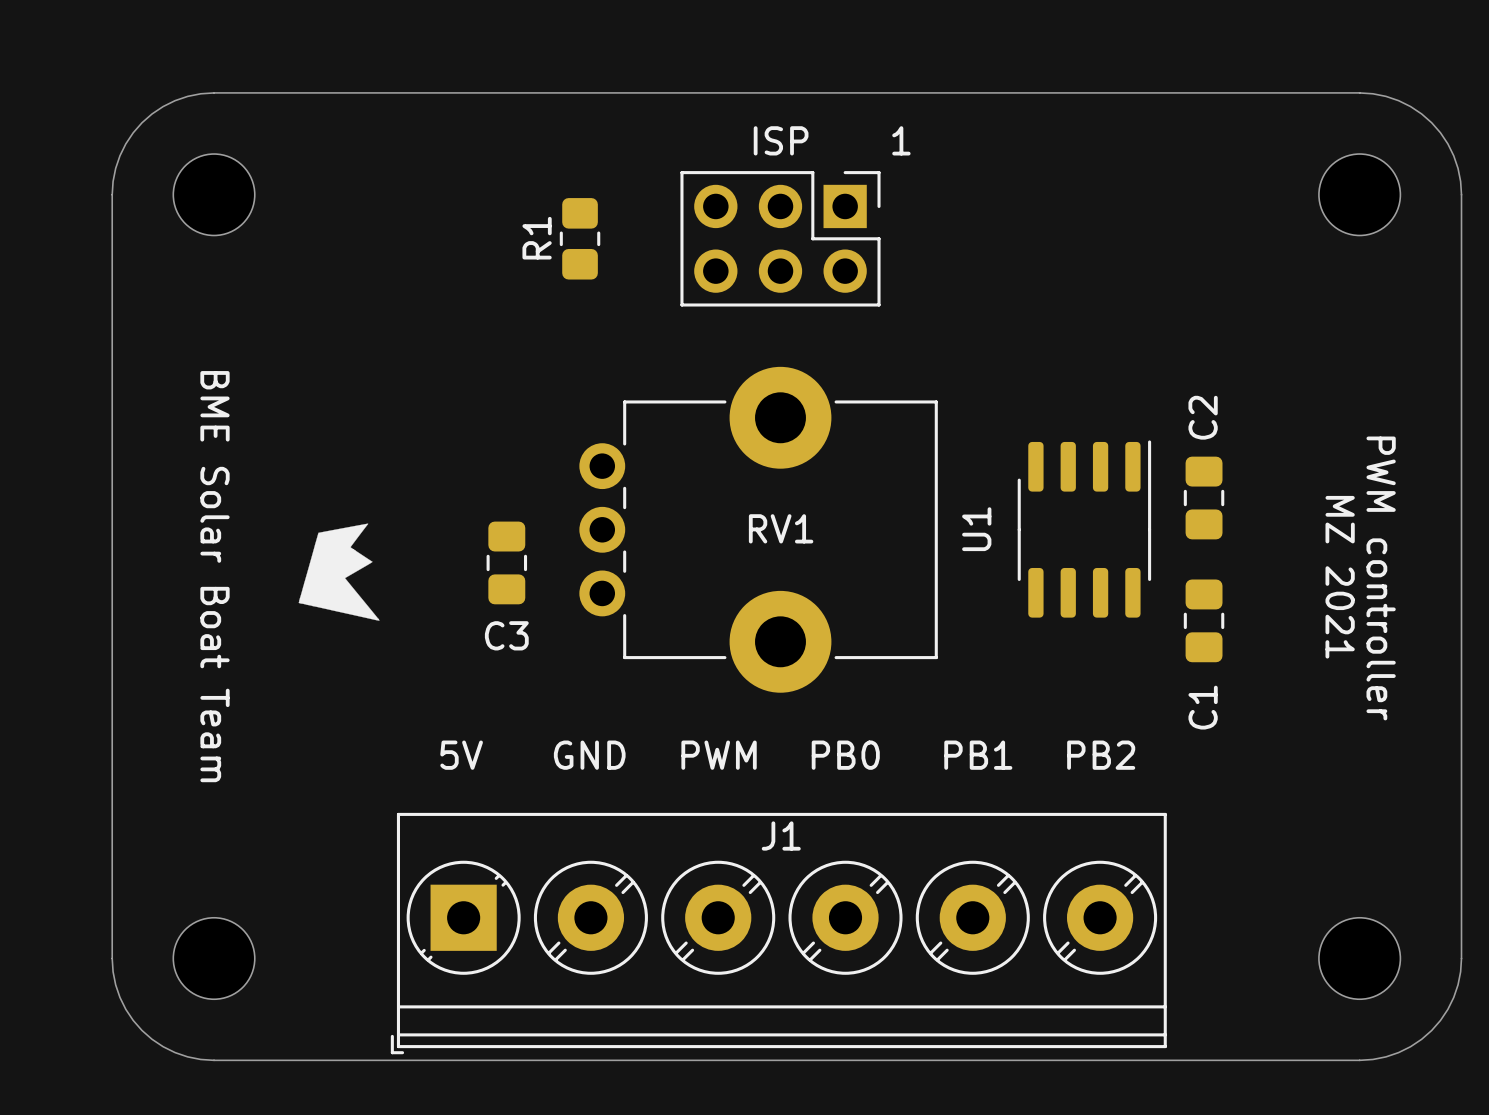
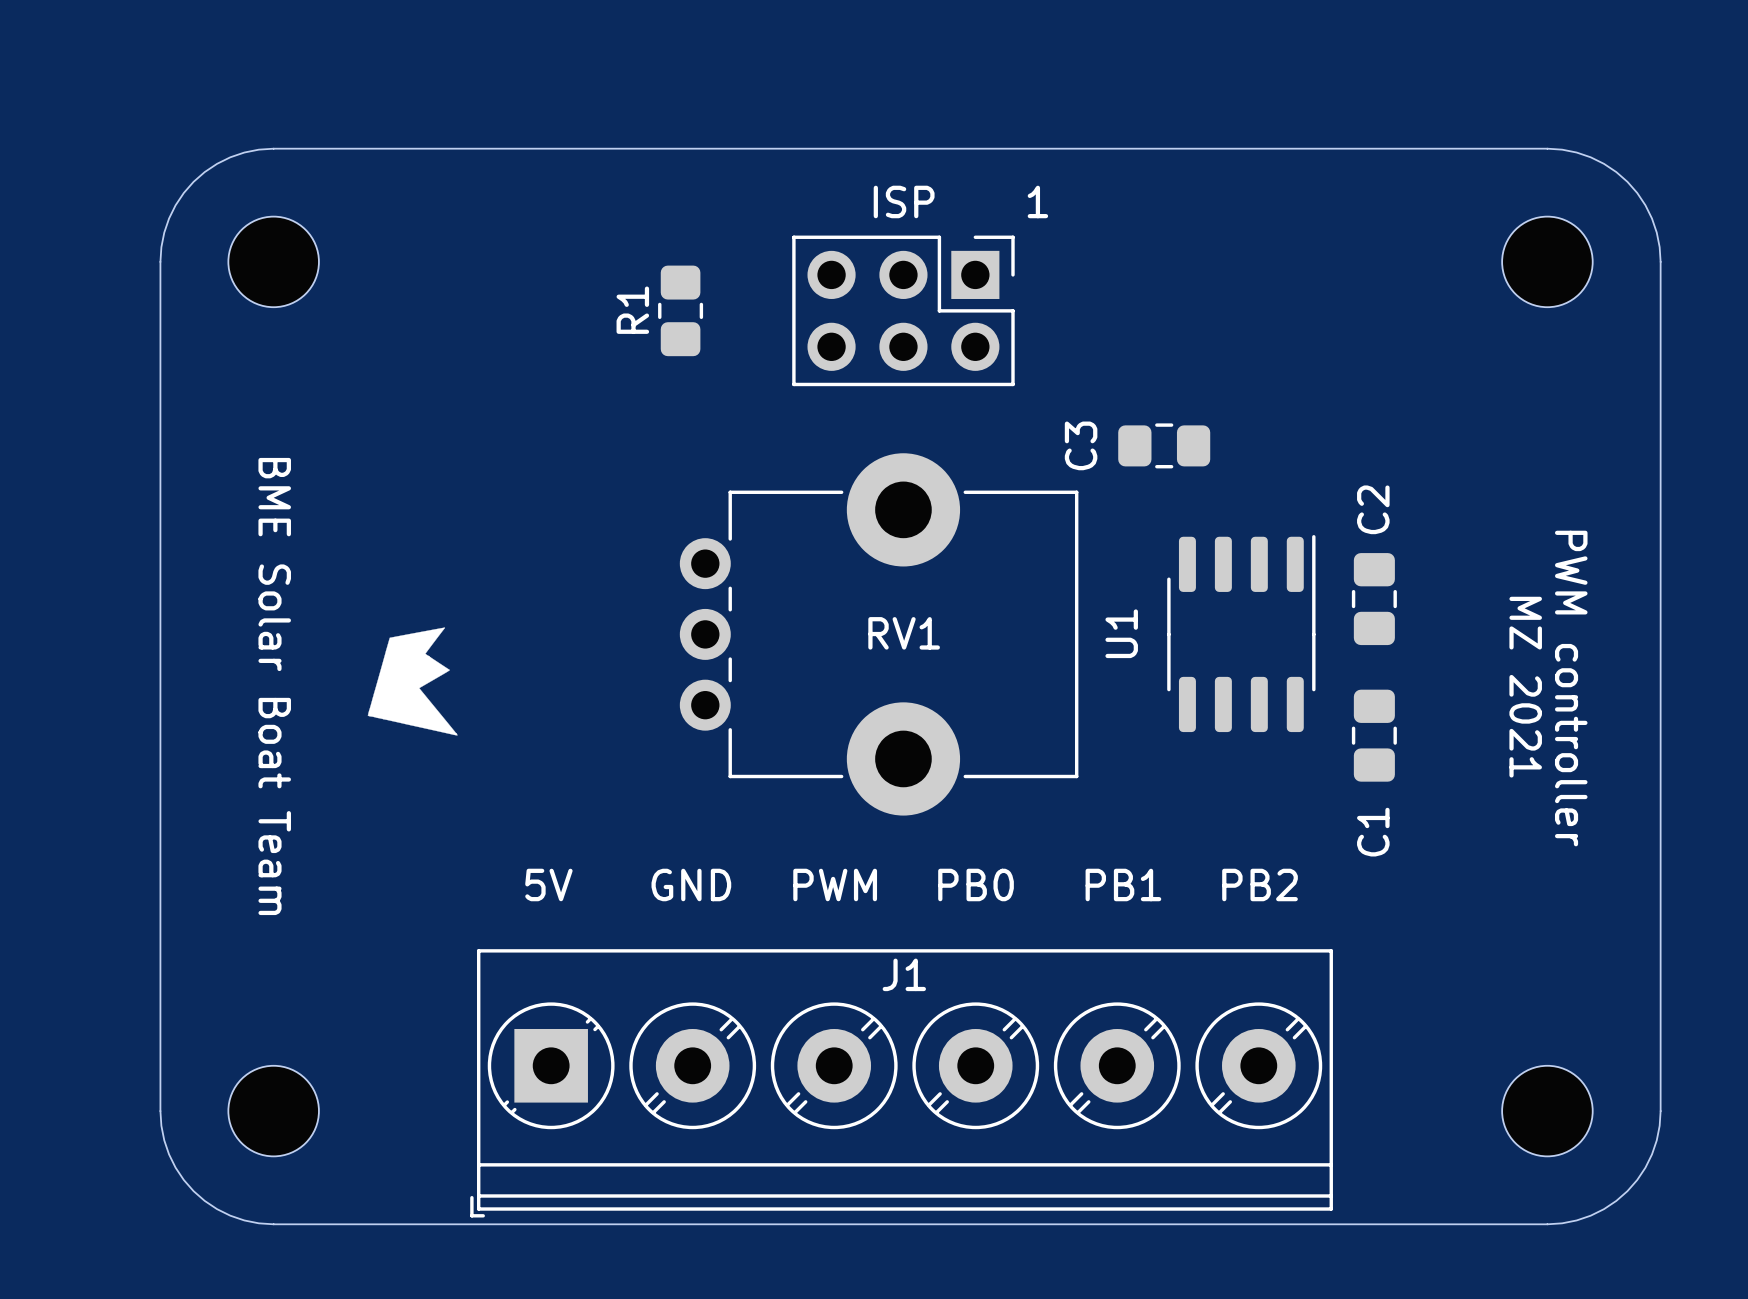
C3 rotation: 0° (506, 562) -> 90° clockwise (1164, 445)
C3 position: (506, 562) -> (1164, 445)

